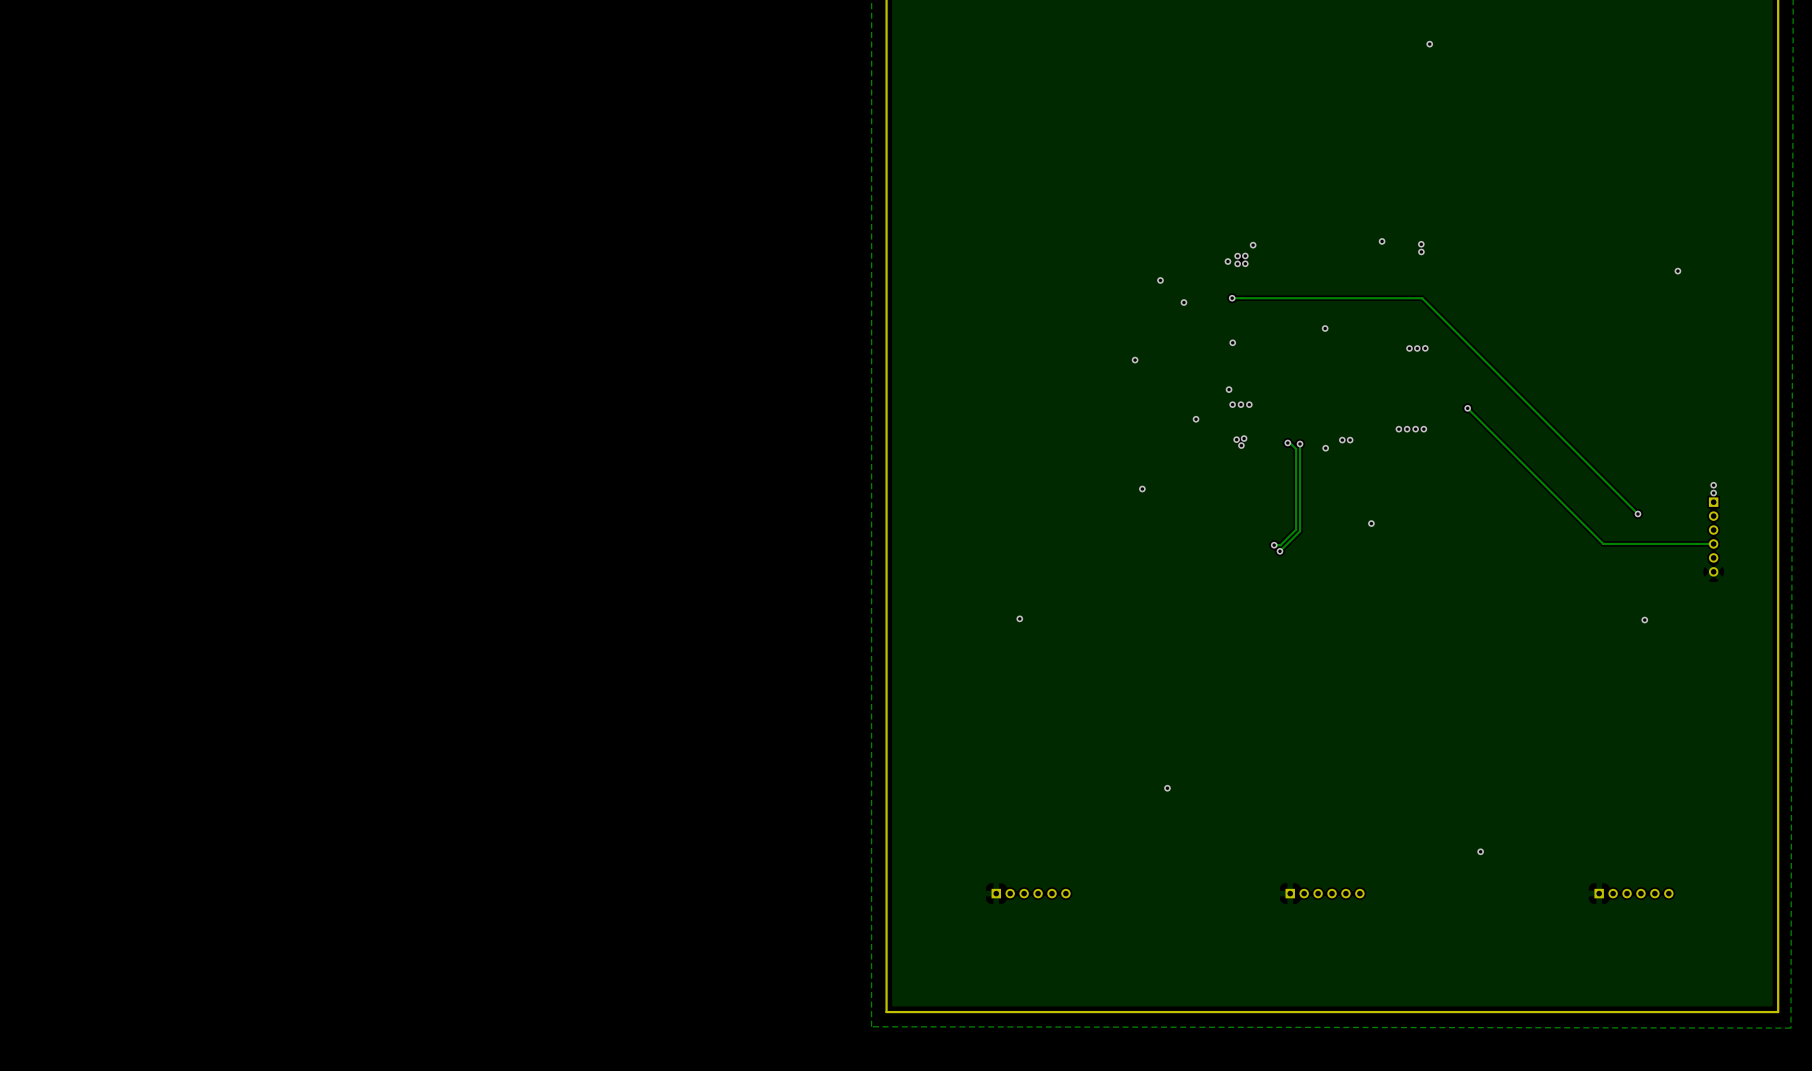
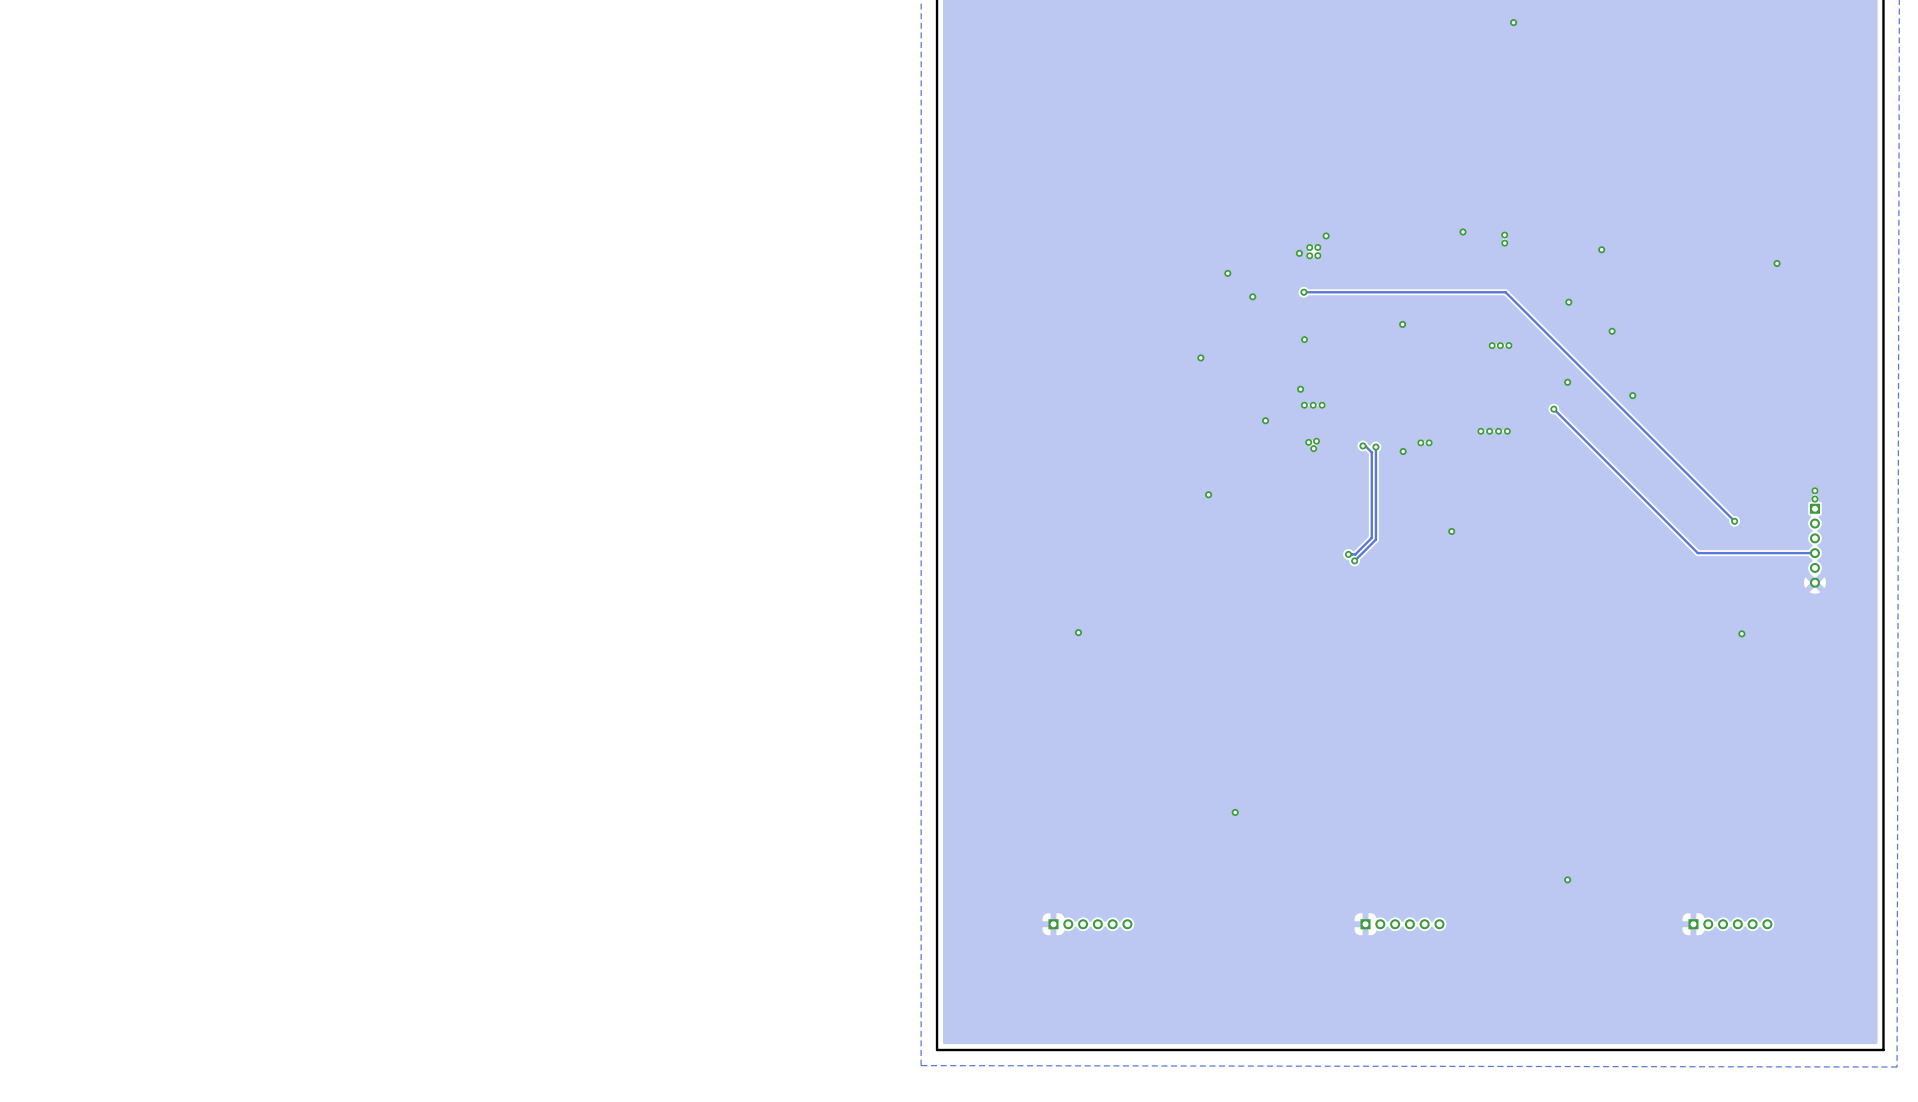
via: none -> (1601, 249)
via: none -> (1568, 302)
via: none -> (1612, 331)
via: none -> (1567, 382)
via: none -> (1632, 395)

